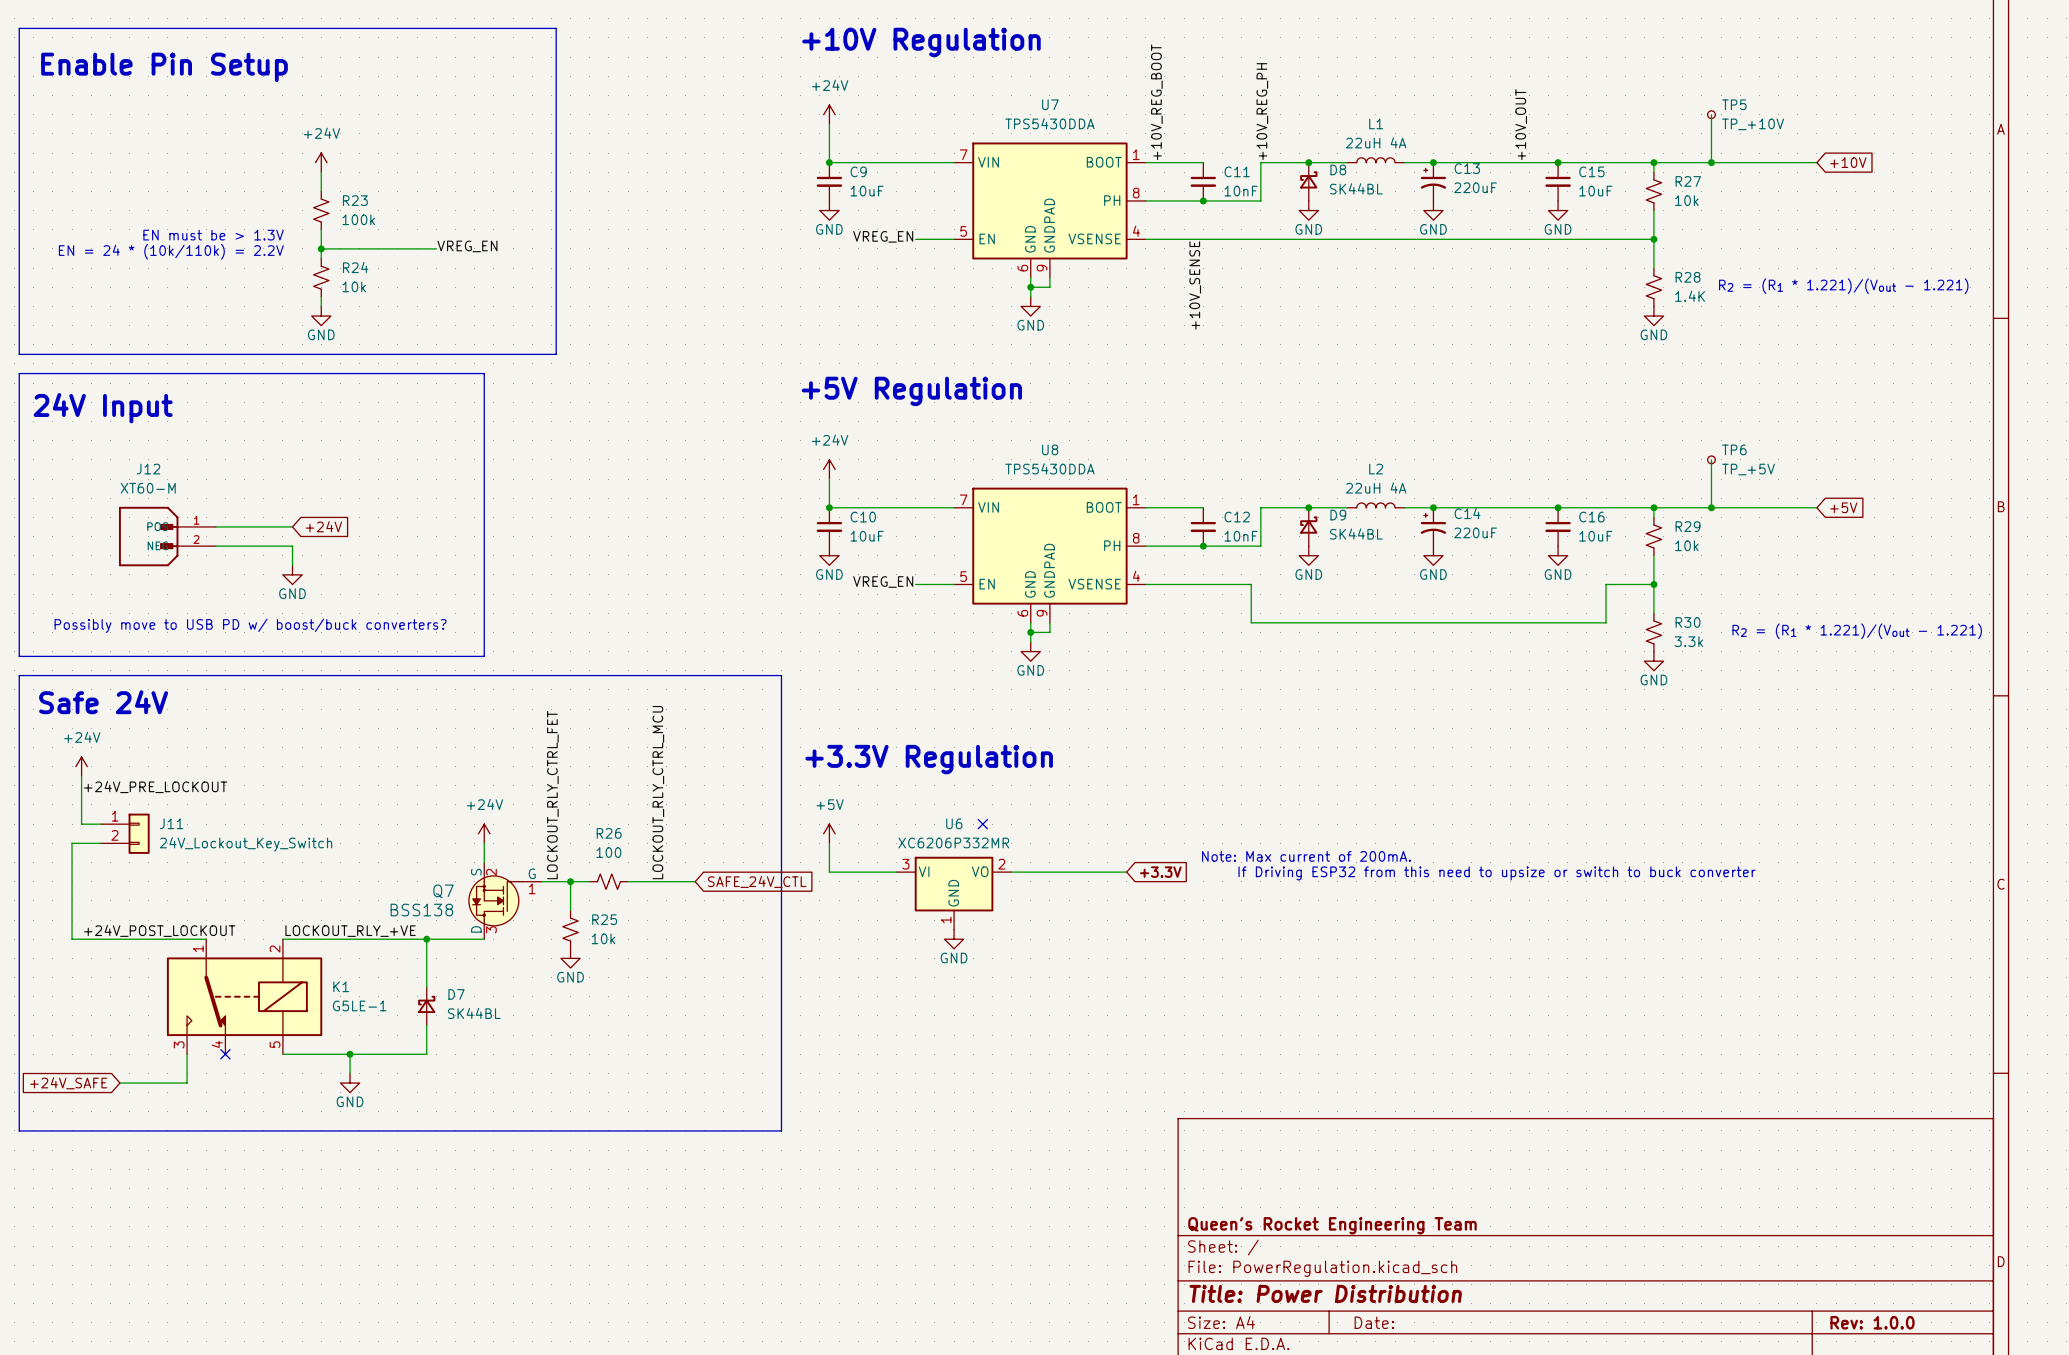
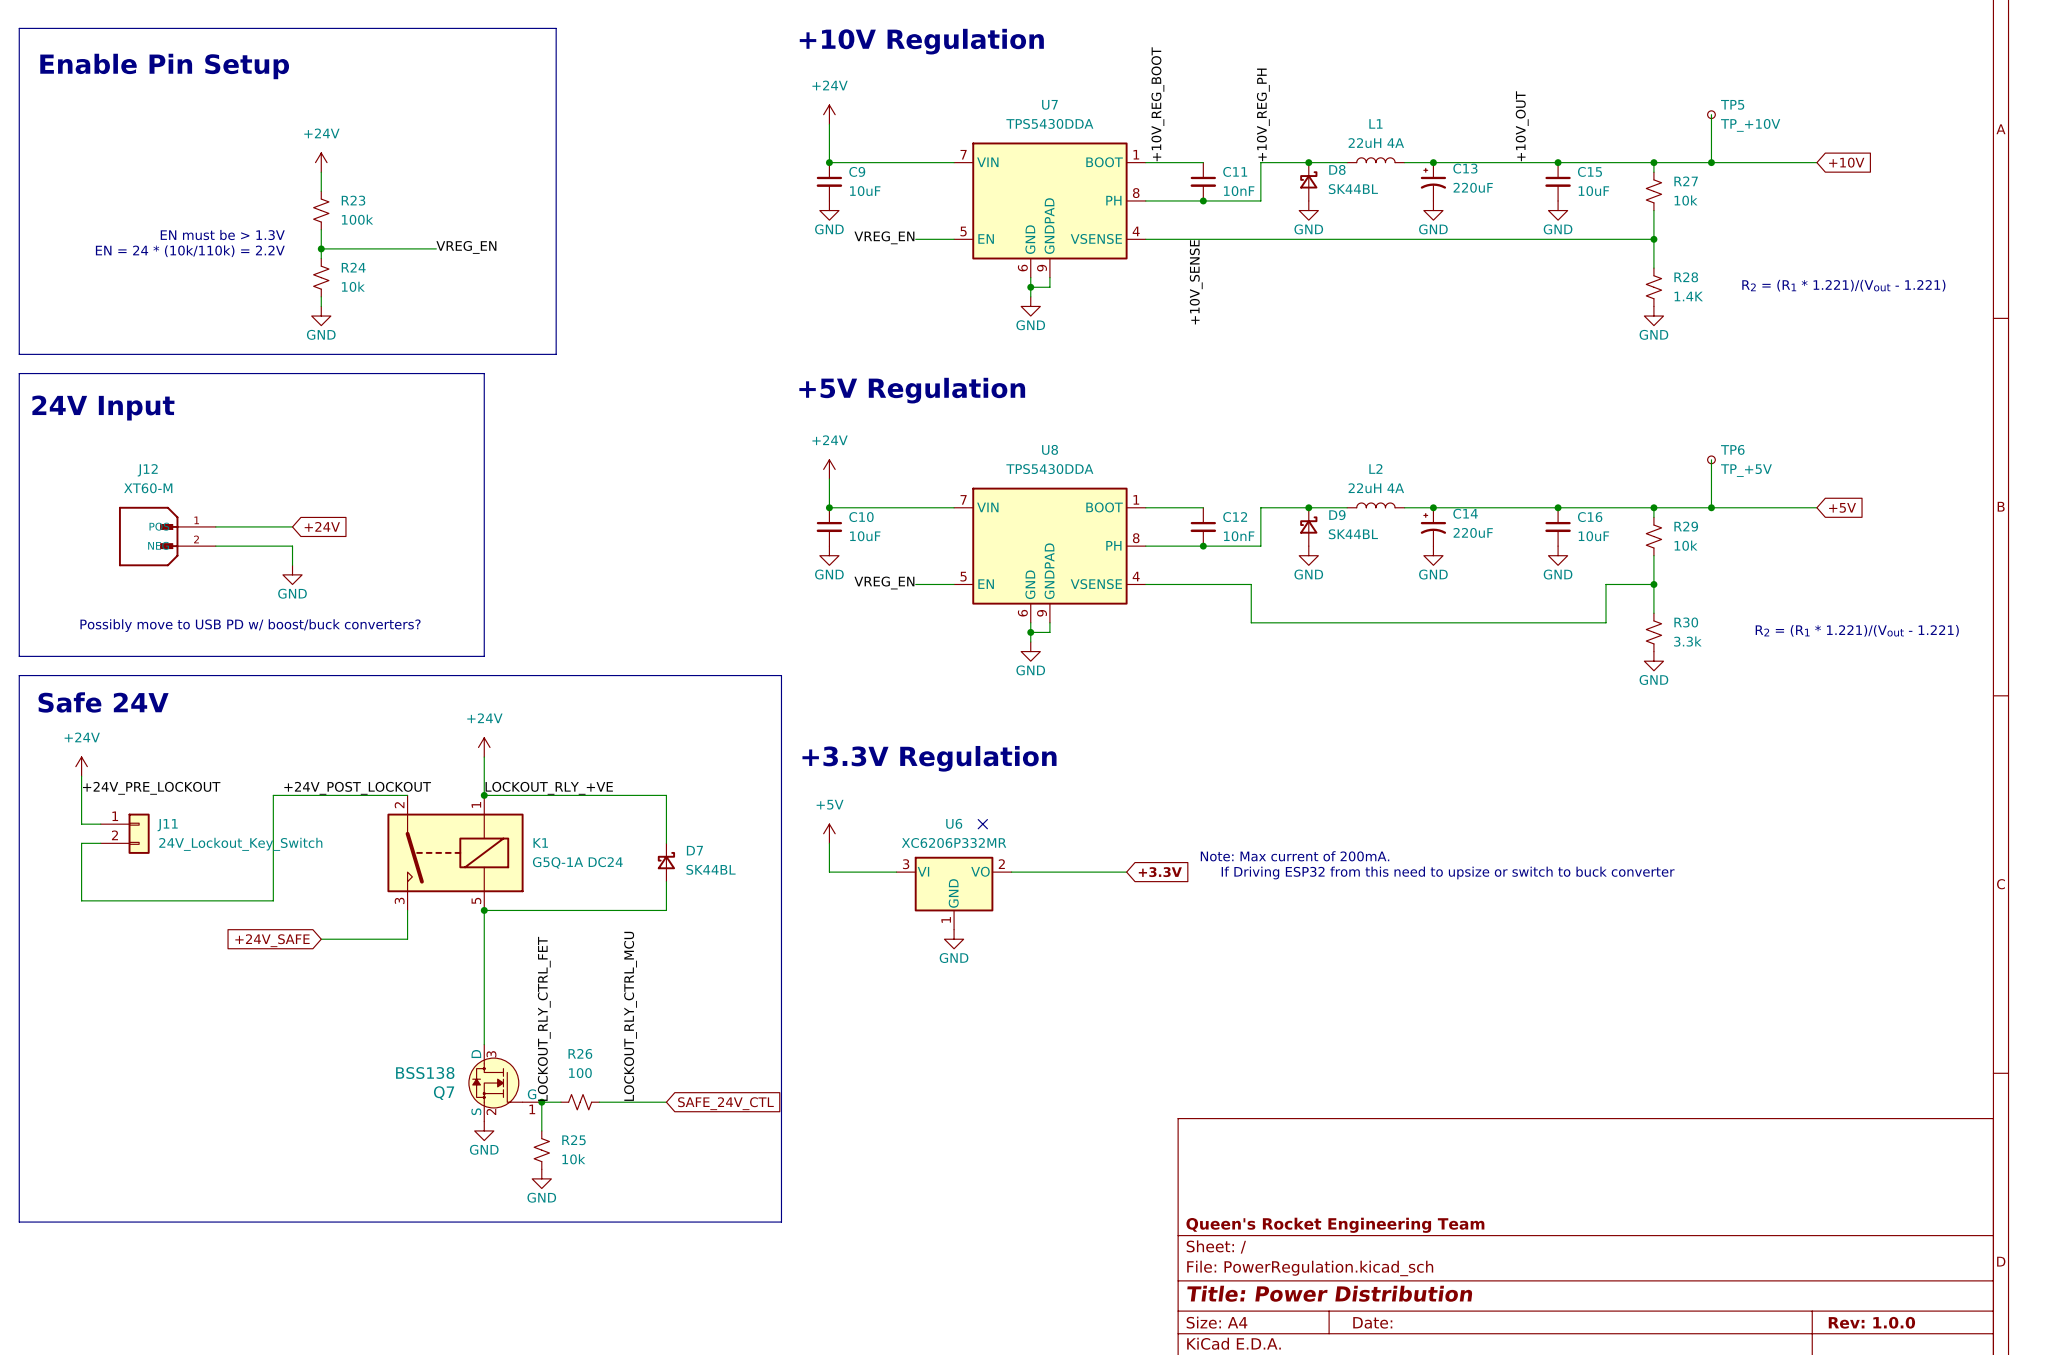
wire: none -> (484, 757) (484, 795) (666, 795) (666, 843)
label: none -> +24V_POST_LOCKOUT (357, 788)
label: LOCKOUT_RLY_CTRL_MCU (658, 792) -> none
junction: none -> (484, 795)
label: LOCKOUT_RLY_CTRL_FET (552, 795) -> LOCKOUT_RLY_+VE (549, 788)
power symbol position: +24V (484, 833) -> +24V (484, 747)
wire: (81, 843) (72, 843) (72, 939) (206, 939) -> (81, 843) (81, 900) (273, 900) (273, 795) (407, 795)
wire: (541, 881) (589, 881) -> none
wire: (570, 881) (570, 910) -> none
junction: (570, 881) -> none
R26 position: (608, 881) -> (580, 1102)
wire: (628, 881) (695, 881) -> none
wire: none -> (666, 881) (666, 910) (484, 910) (484, 1044)
global label: SAFE_24V_CTL (757, 881) -> none
Q7 flip: as is (495, 900) -> up-down (495, 1083)
Q7 position: (505, 900) -> (505, 1083)
junction: none -> (484, 910)
R25 position: (570, 929) -> (541, 1150)
label: +24V_POST_LOCKOUT (159, 930) -> none
label: LOCKOUT_RLY_+VE (350, 931) -> none
K1 symbol: [166, 939, 323, 1055] -> [387, 795, 524, 911]
global label: none -> +24V_SAFE (272, 940)
wire: (282, 939) (321, 939) -> none
wire: (407, 939) (484, 939) -> (407, 939) (407, 910)
wire: (426, 939) (426, 987) -> none
junction: (426, 939) -> none
power symbol: GND (570, 958) -> none
K1 value: G5LE-1 (359, 1005) -> G5Q-1A DC24 (577, 862)
D7 position: (426, 1006) -> (666, 862)
label: none -> LOCKOUT_RLY_CTRL_MCU (630, 1016)
label: none -> LOCKOUT_RLY_CTRL_FET (544, 1018)
wire: (426, 1025) (426, 1054) (282, 1054) -> none
wire: (187, 1054) (187, 1083) (119, 1083) -> none
no-connect mark: (225, 1054) -> none
wire: (350, 1054) (350, 1073) -> none
junction: (350, 1054) -> none
global label: +24V_SAFE (68, 1083) -> none
power symbol: GND (350, 1083) -> none
junction: none -> (541, 1102)
wire: none -> (560, 1102) (541, 1102) (541, 1130)
wire: none -> (599, 1102) (666, 1102)
global label: none -> SAFE_24V_CTL (725, 1103)
line: (19, 1130) (781, 1130) -> (19, 1130) (19, 1222) (781, 1222) (781, 1130)
power symbol: none -> GND (484, 1130)
power symbol: none -> GND (541, 1178)

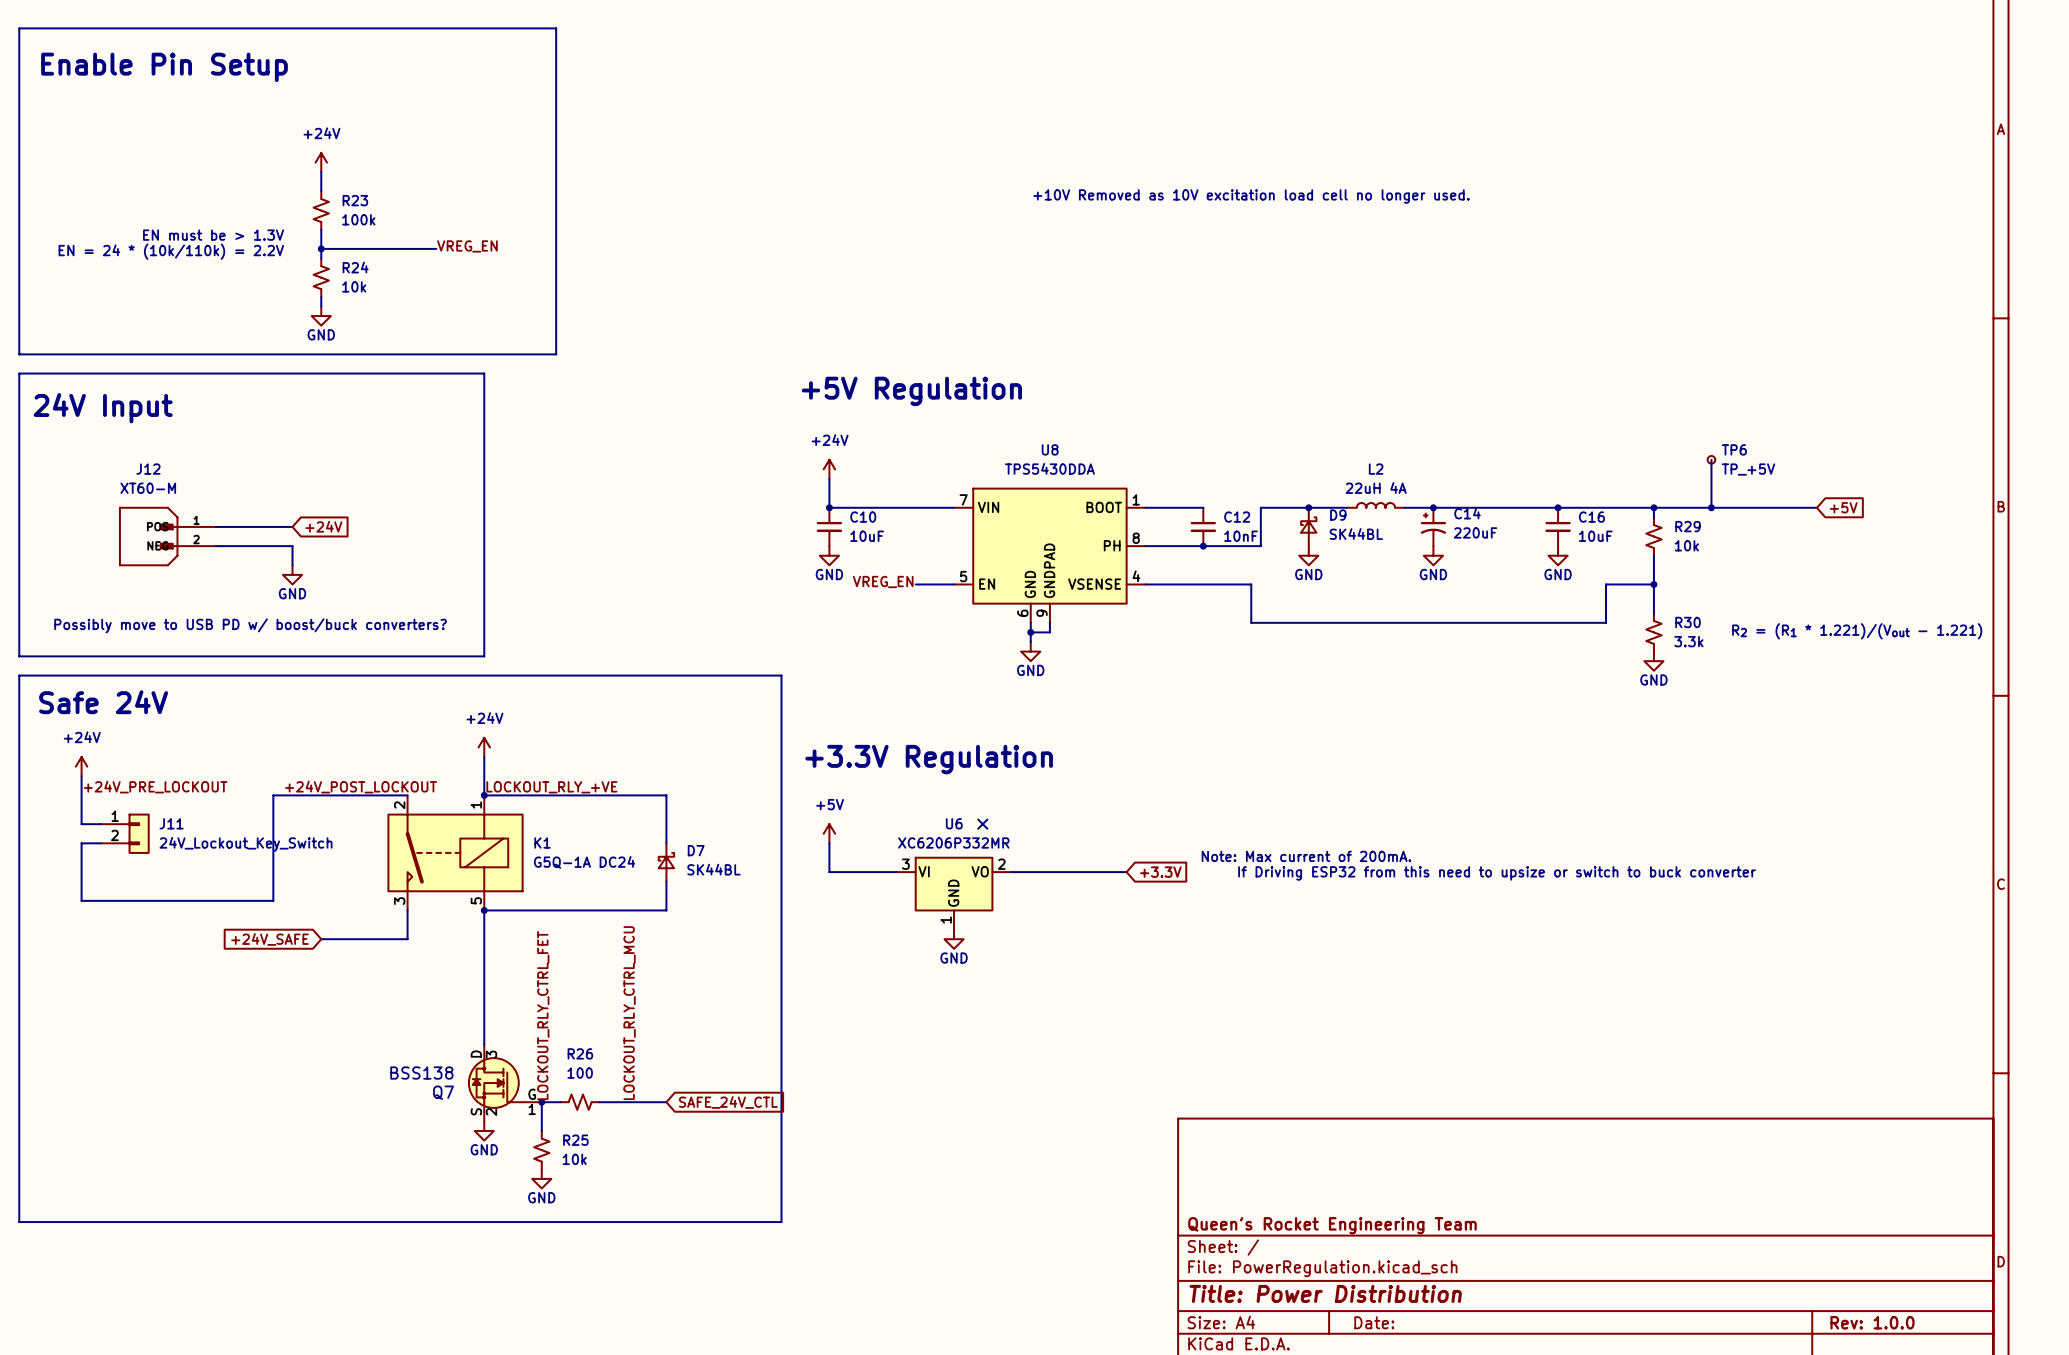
text: +10V Regulation (921, 41) -> none
label: +10V_REG_BOOT (1157, 104) -> none
power symbol: +24V (829, 114) -> none
label: +10V_REG_PH (1263, 114) -> none
wire: (1711, 114) (1711, 162) -> none
TP5: TP_+10V (1711, 114) -> none
wire: (829, 124) (829, 162) (954, 162) -> none
label: +10V_OUT (1522, 126) -> none
L1: 22uH 4A (1375, 160) -> none
junction: (829, 162) -> none
wire: (1145, 162) (1203, 162) -> none
junction: (1308, 162) -> none
wire: (1347, 162) (1260, 162) (1260, 200) (1145, 200) -> none
wire: (1404, 162) (1816, 162) -> none
junction: (1433, 162) -> none
junction: (1558, 162) -> none
wire: (1653, 162) (1653, 172) -> none
junction: (1653, 162) -> none
junction: (1711, 162) -> none
global label: +10V (1846, 162) -> none
C9: 10uF (829, 181) -> none
C11: 10nF (1203, 181) -> none
D8: SK44BL (1308, 181) -> none
C13: 220uF (1433, 181) -> none
C15: 10uF (1558, 181) -> none
R27: 10k (1653, 191) -> none
text: none -> +10V Removed as 10V excitation load cell no longer used. (1251, 196)
junction: (1203, 200) -> none
power symbol: GND (829, 210) -> none
U7: TPS5430DDA (1049, 210) -> none
power symbol: GND (1308, 210) -> none
power symbol: GND (1433, 210) -> none
power symbol: GND (1558, 210) -> none
wire: (1653, 210) (1653, 268) -> none
label: VREG_EN (884, 237) -> none
wire: (915, 239) (954, 239) -> none
wire: (1145, 239) (1653, 239) -> none
junction: (1653, 239) -> none
wire: (1030, 277) (1030, 296) -> none
wire: (1049, 277) (1049, 287) (1030, 287) -> none
label: +10V_SENSE (1196, 282) -> none
text: R2 = (R1 * 1.221)/(Vout - 1.221) (1843, 285) -> none
junction: (1030, 287) -> none
R28: 1.4K (1653, 287) -> none
power symbol: GND (1030, 306) -> none
power symbol: GND (1653, 316) -> none

